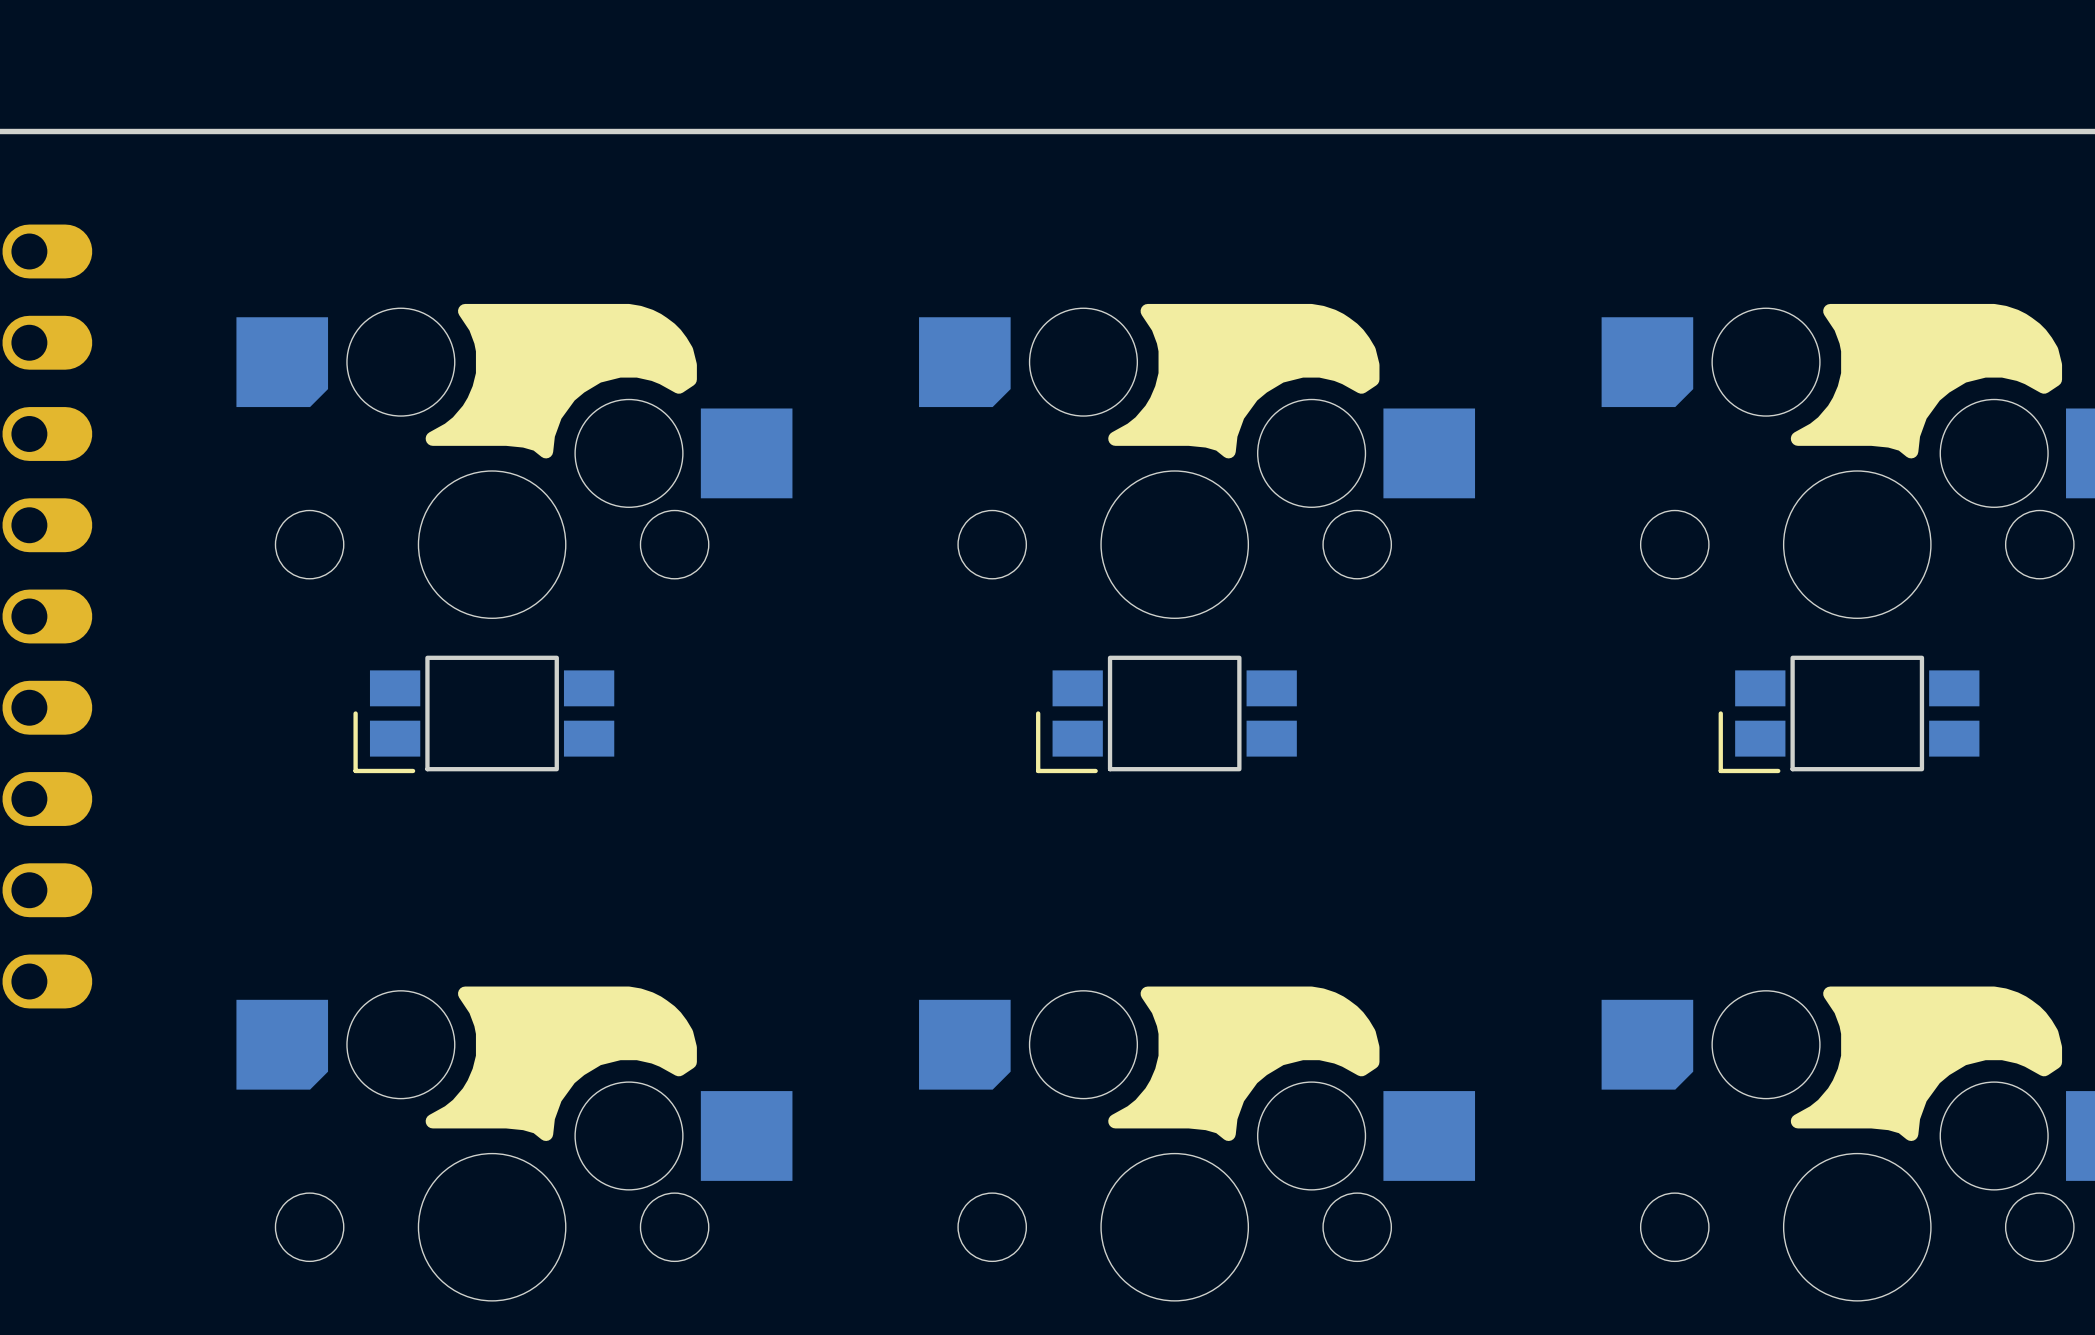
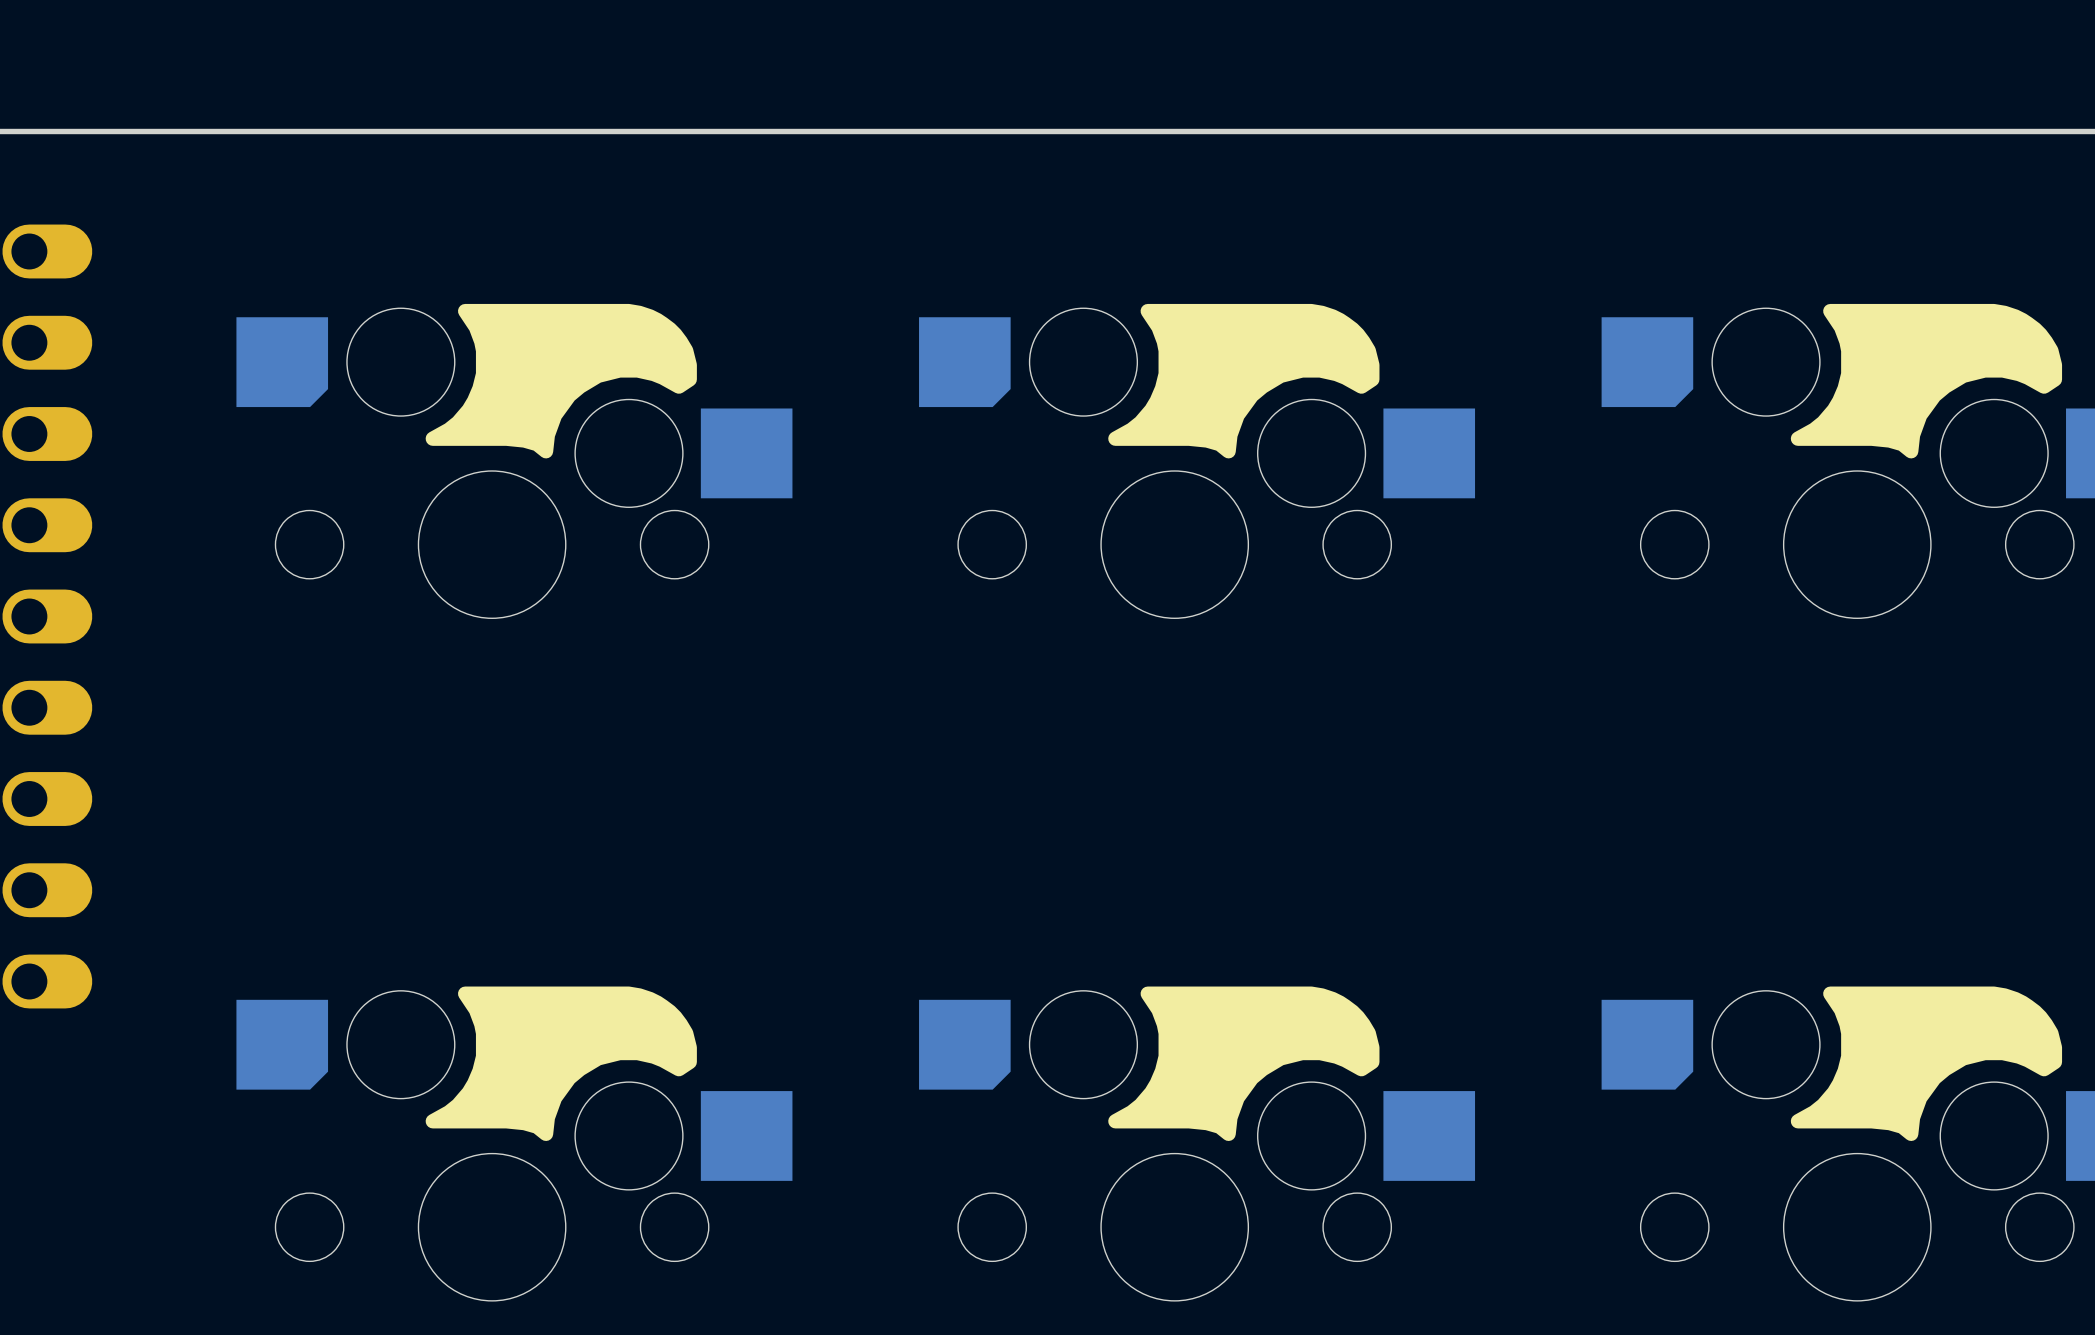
part: (483, 714) -> none
part: (1166, 714) -> none
part: (1849, 714) -> none

